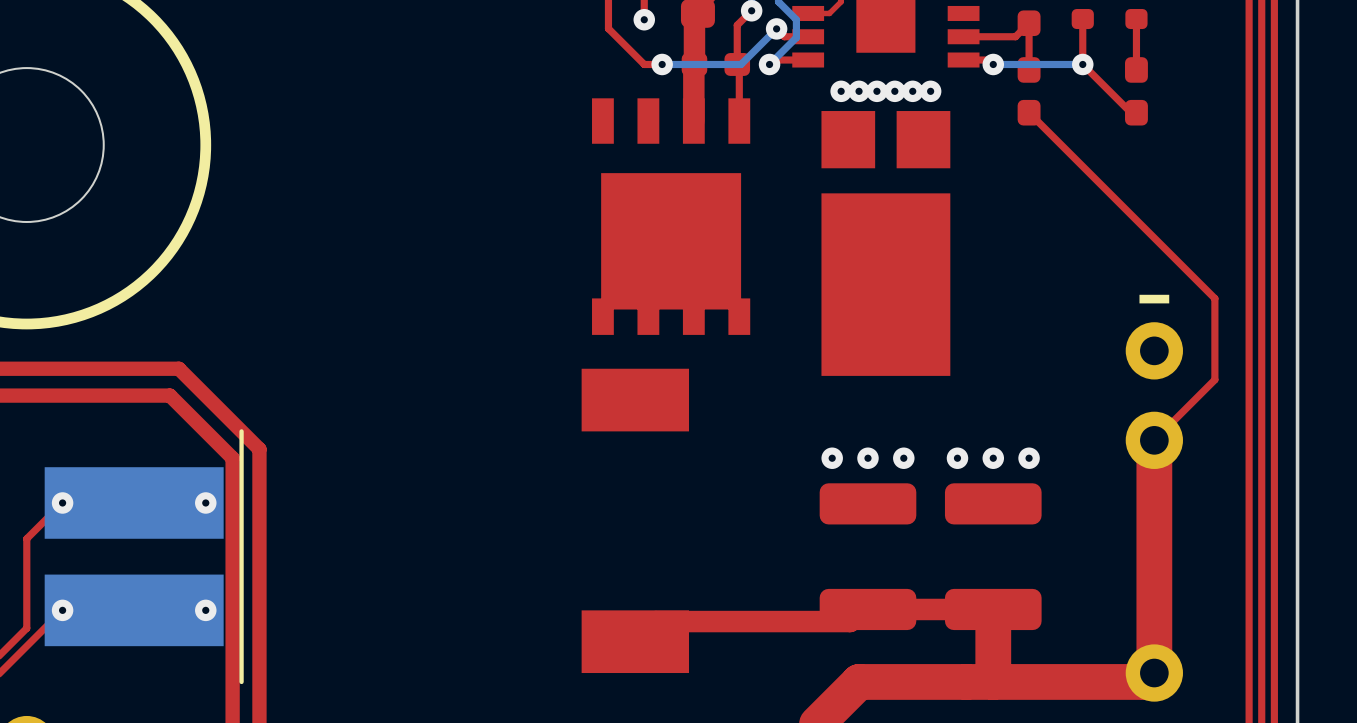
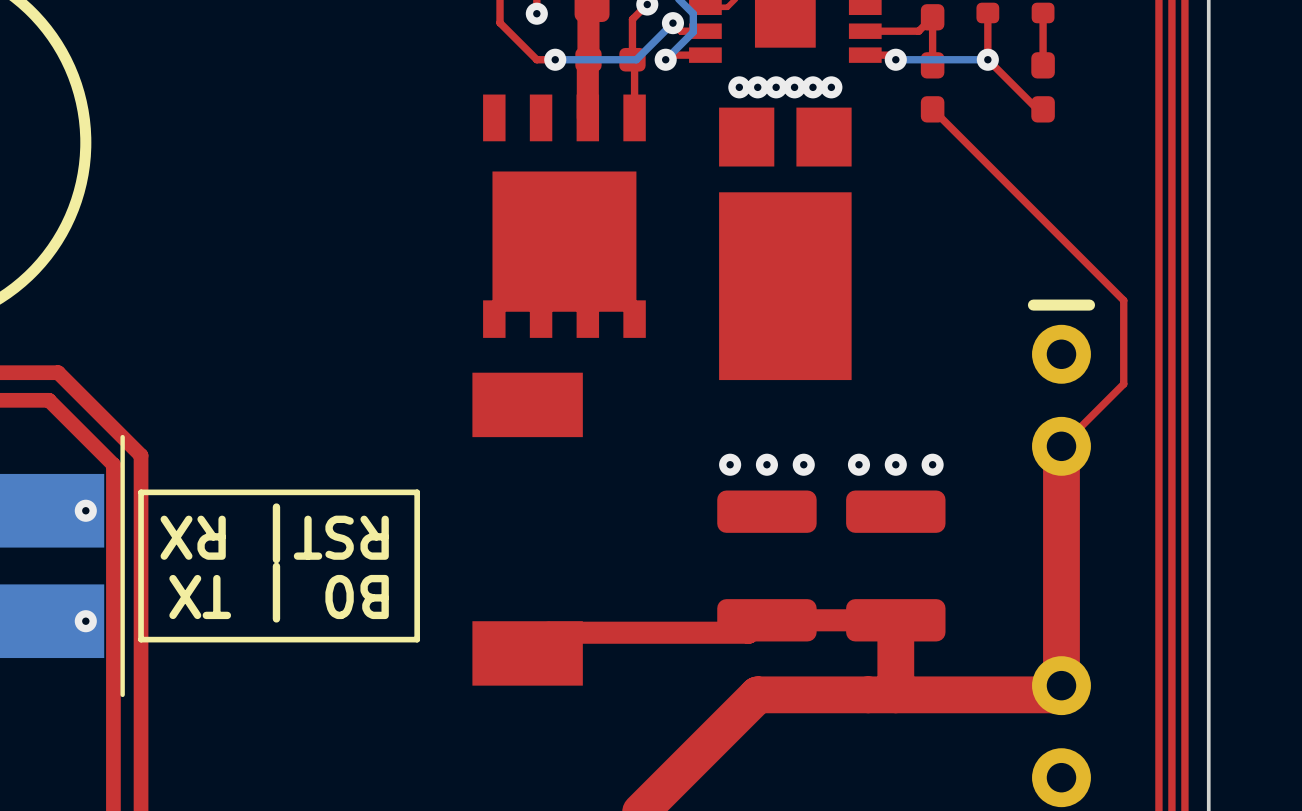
line: none -> (417, 492) (417, 639) (141, 639) (141, 492) (417, 492)
text: none -> RST| RX (274, 533)
text: none -> B0 | TX (279, 592)

